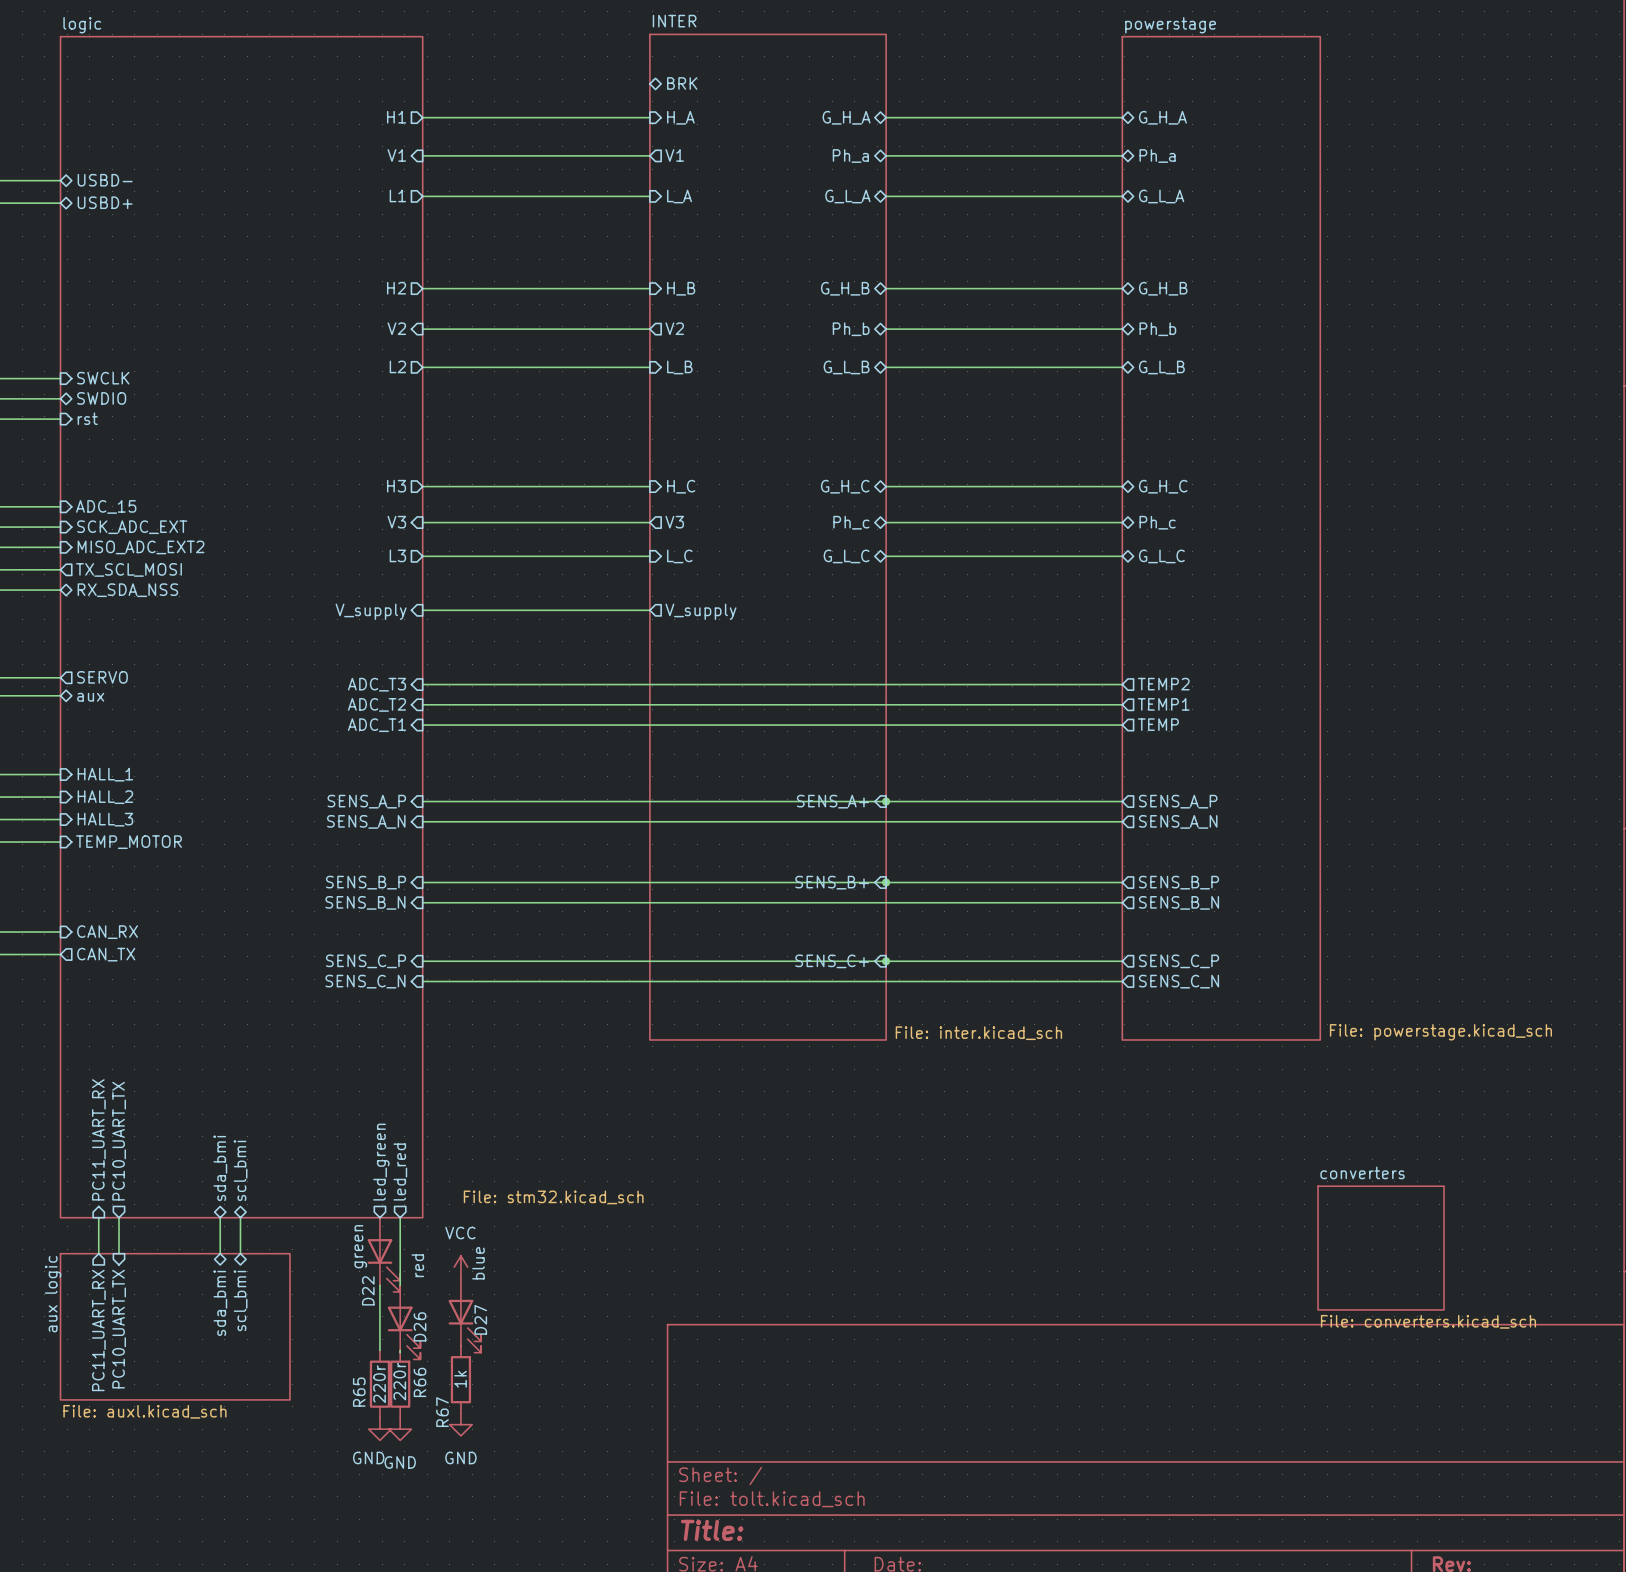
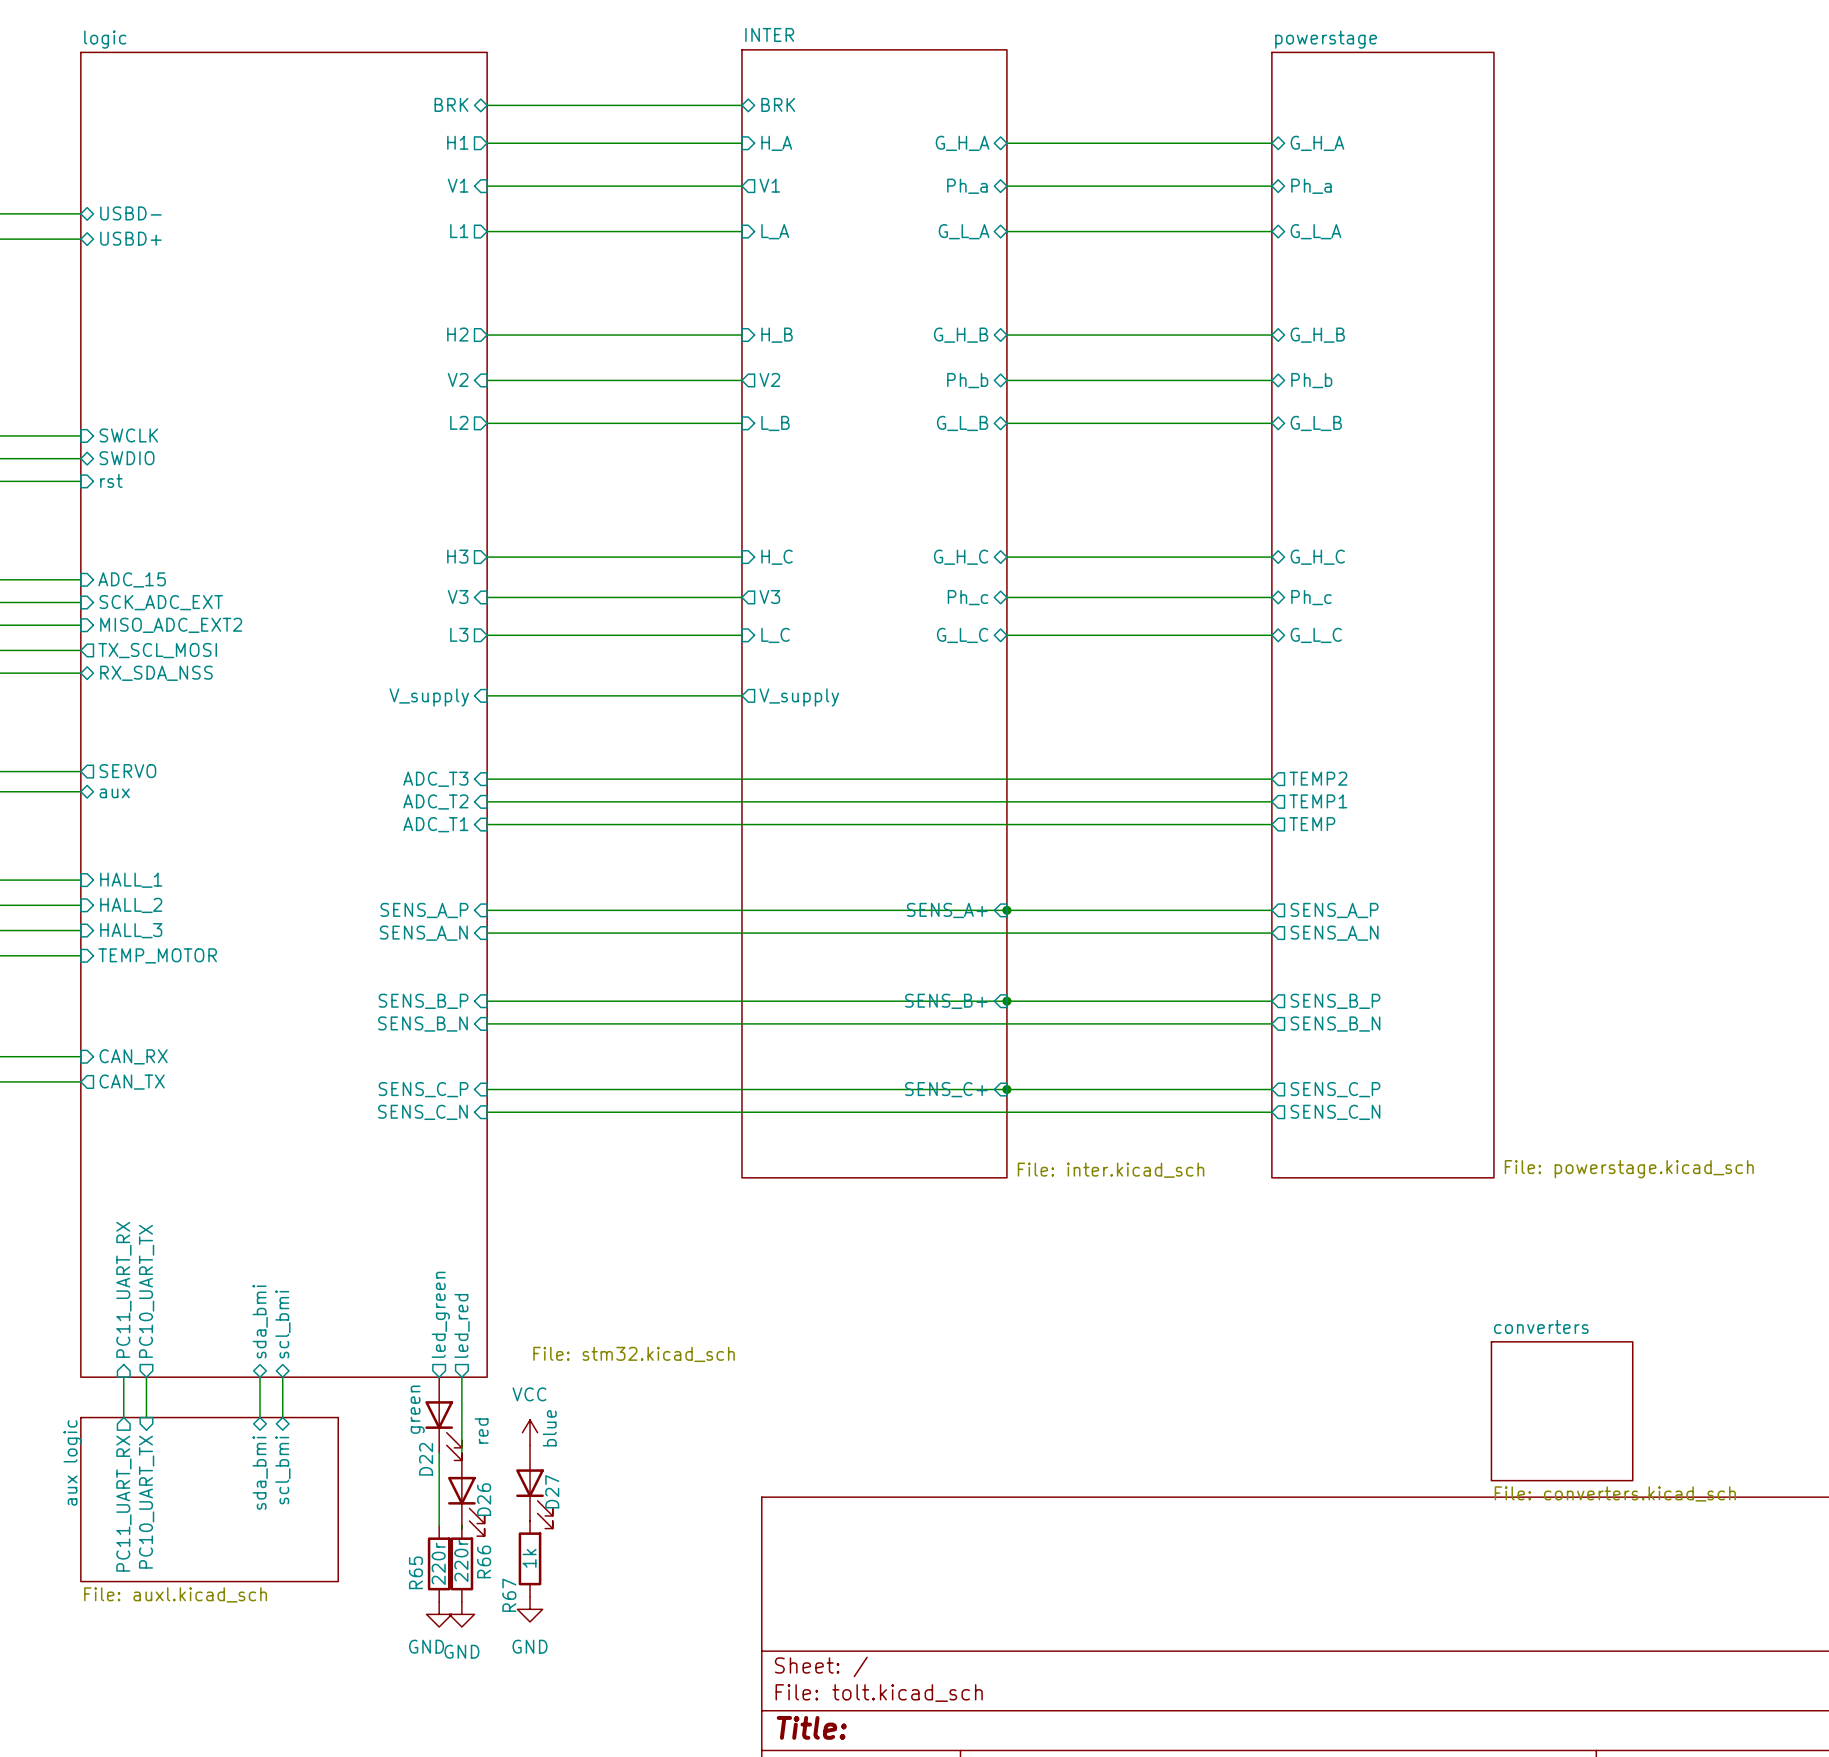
sheet pin: none -> BRK (451, 104)
wire: none -> (487, 105) (741, 105)

